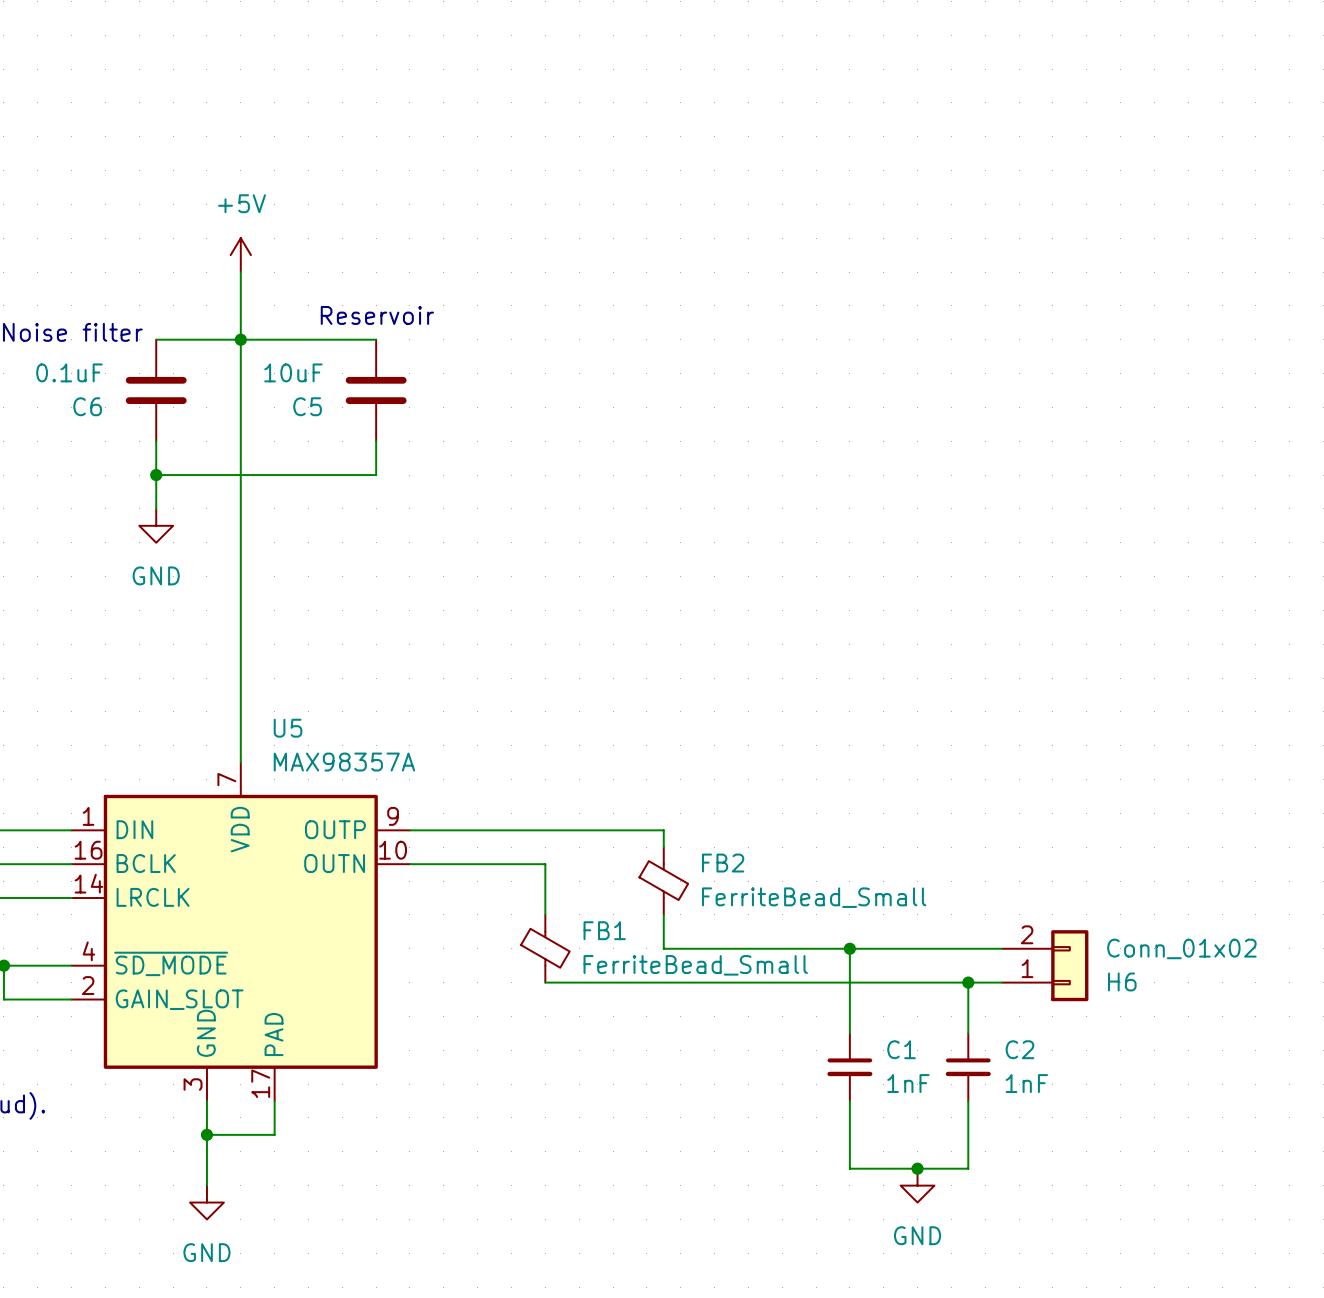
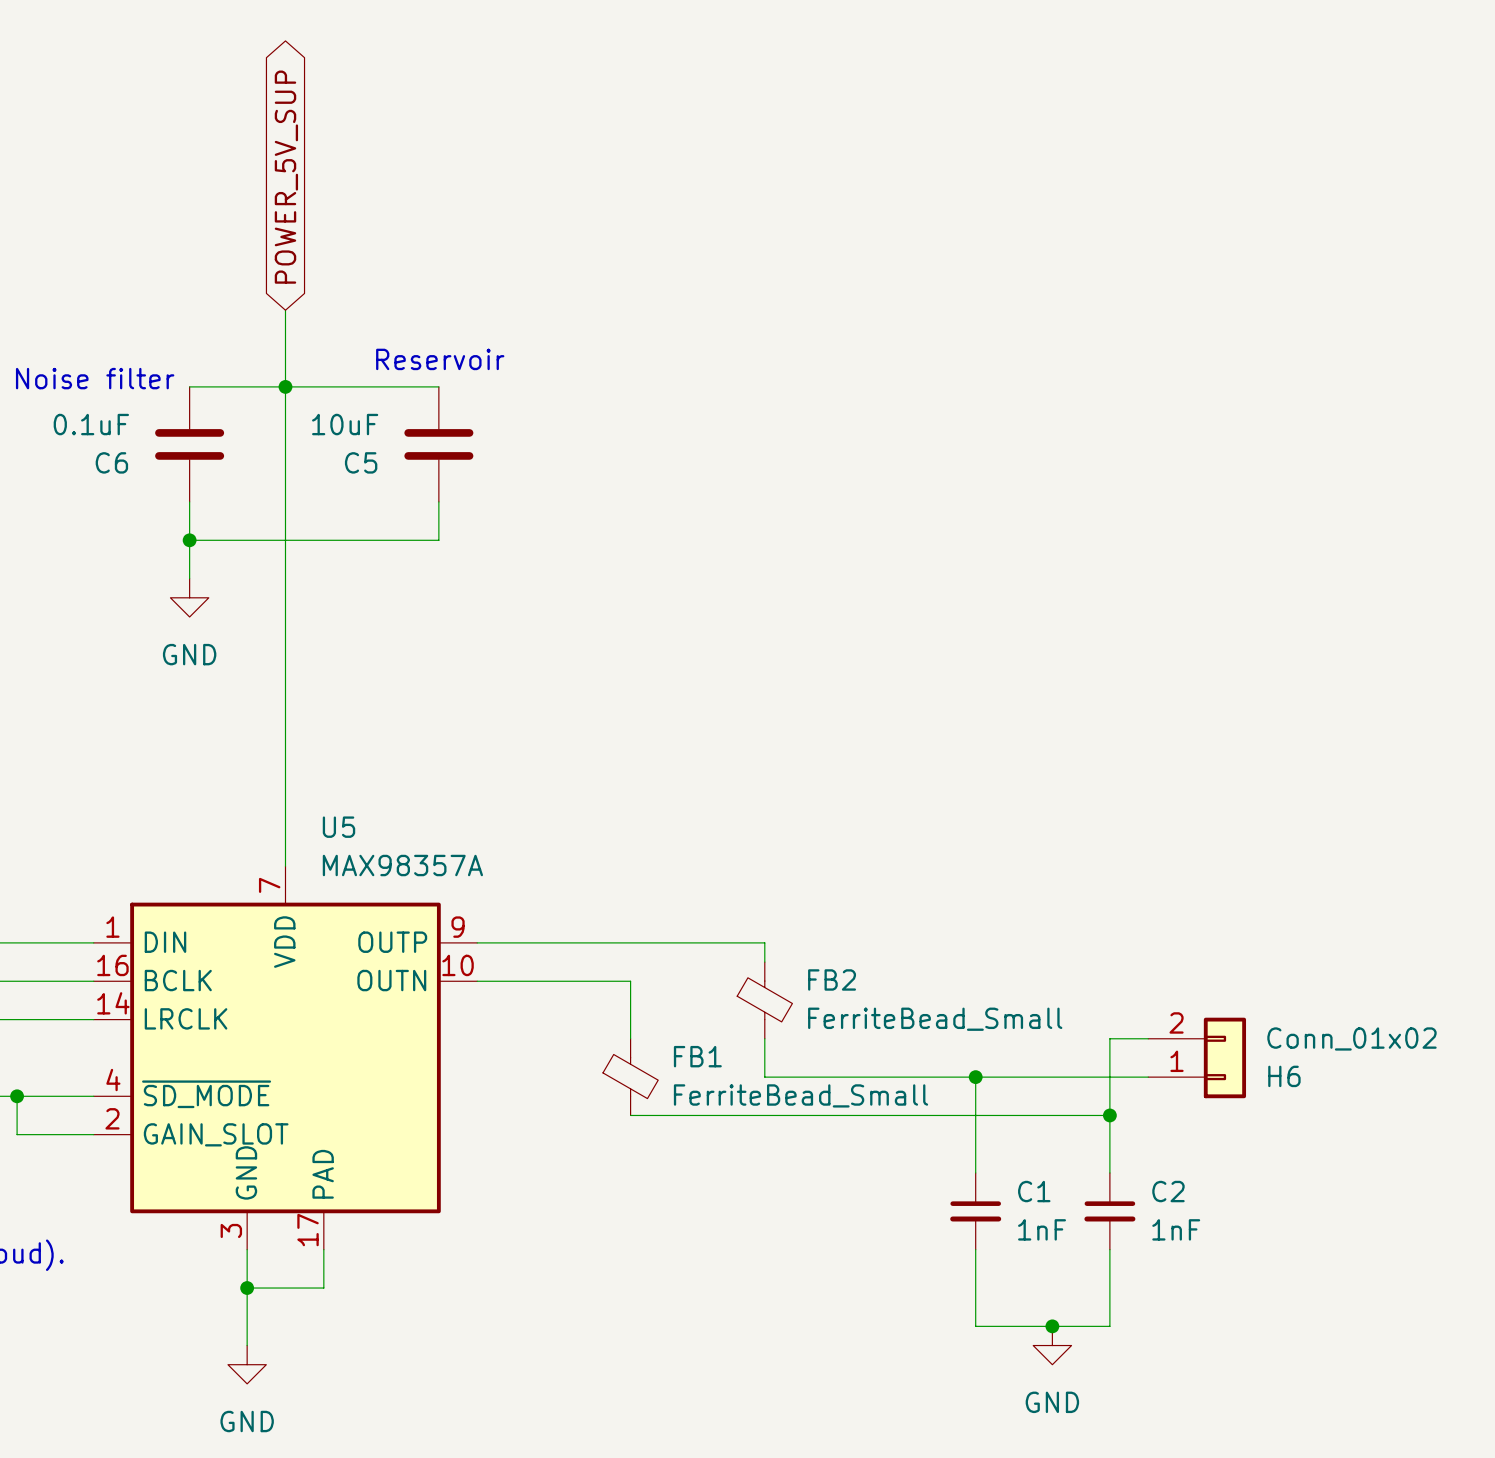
global label: none -> POWER_5V_SUP (286, 177)
power symbol: +5V (240, 255) -> none
H6 position: (1045, 965) -> (1197, 1057)
wire: (968, 982) (1002, 982) -> (1109, 1115) (1109, 1038) (1148, 1038)

